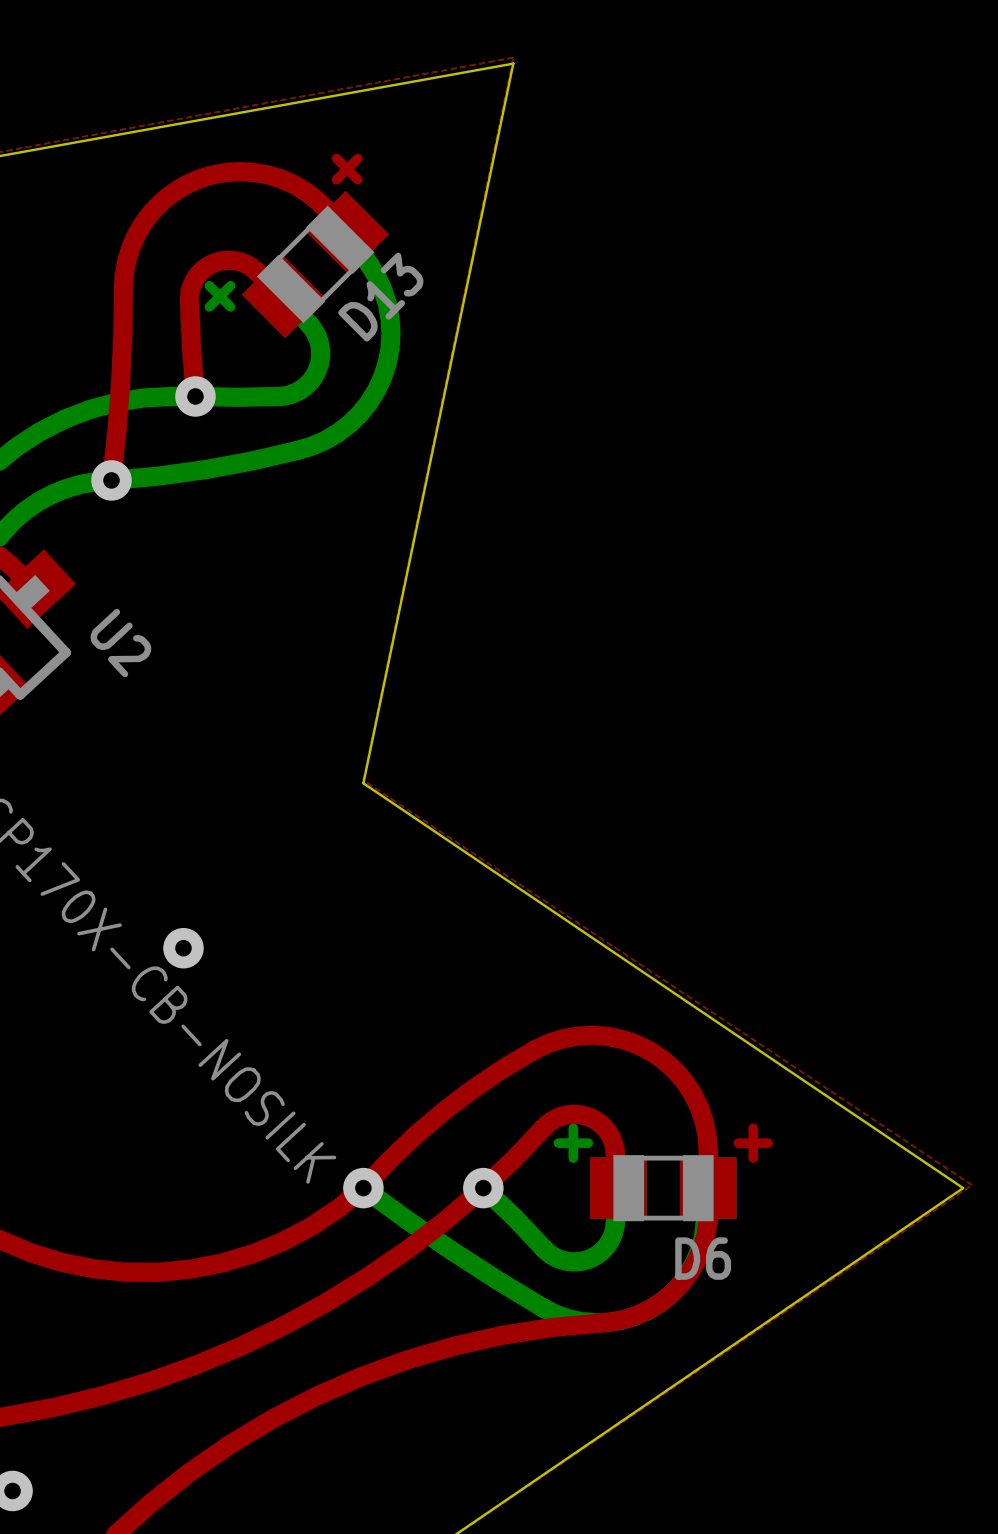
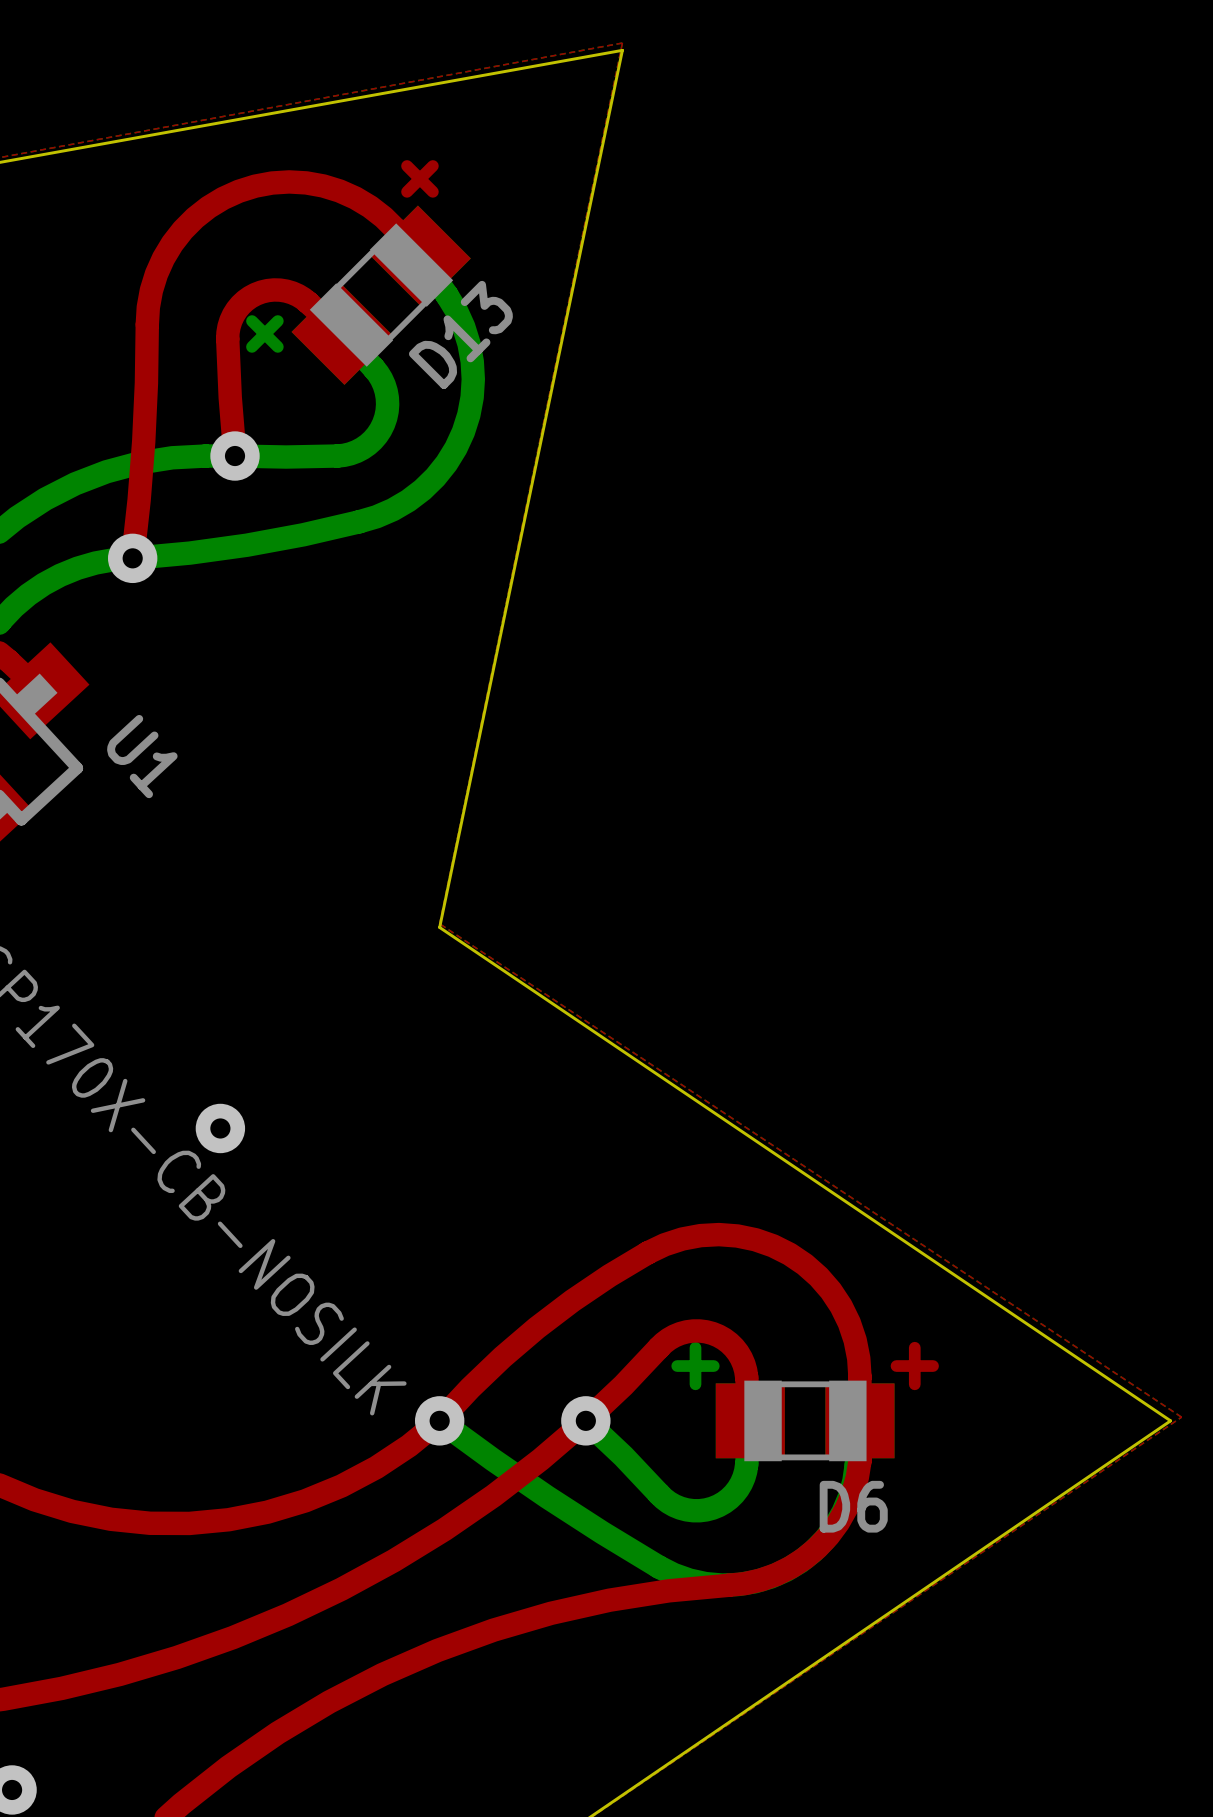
U2 name: U2 (120, 643) -> U1 (142, 756)

